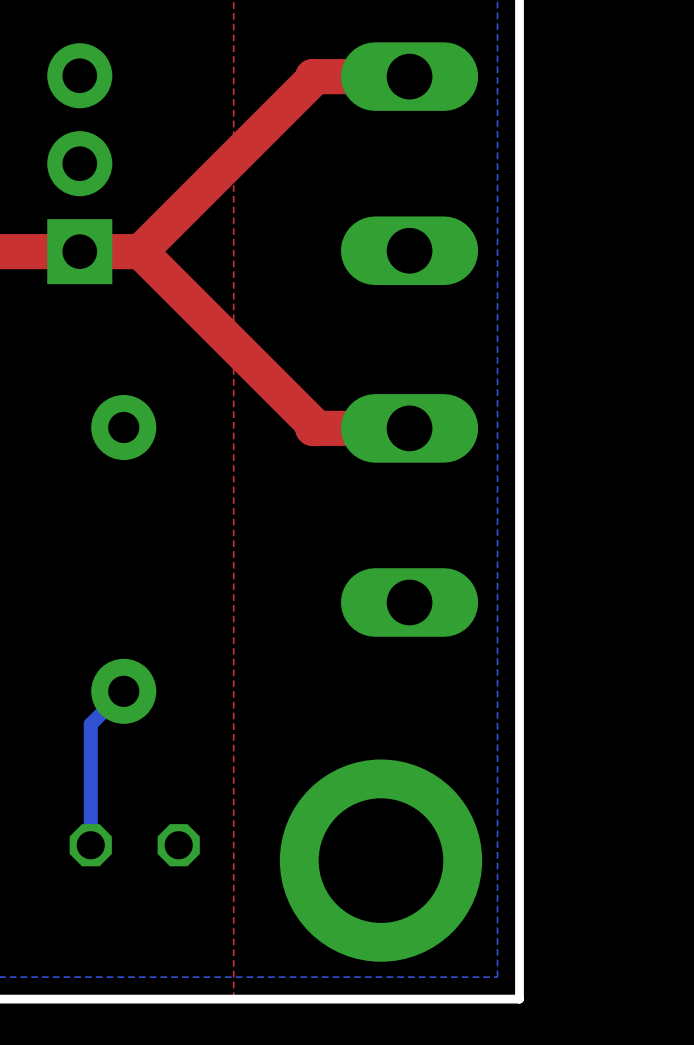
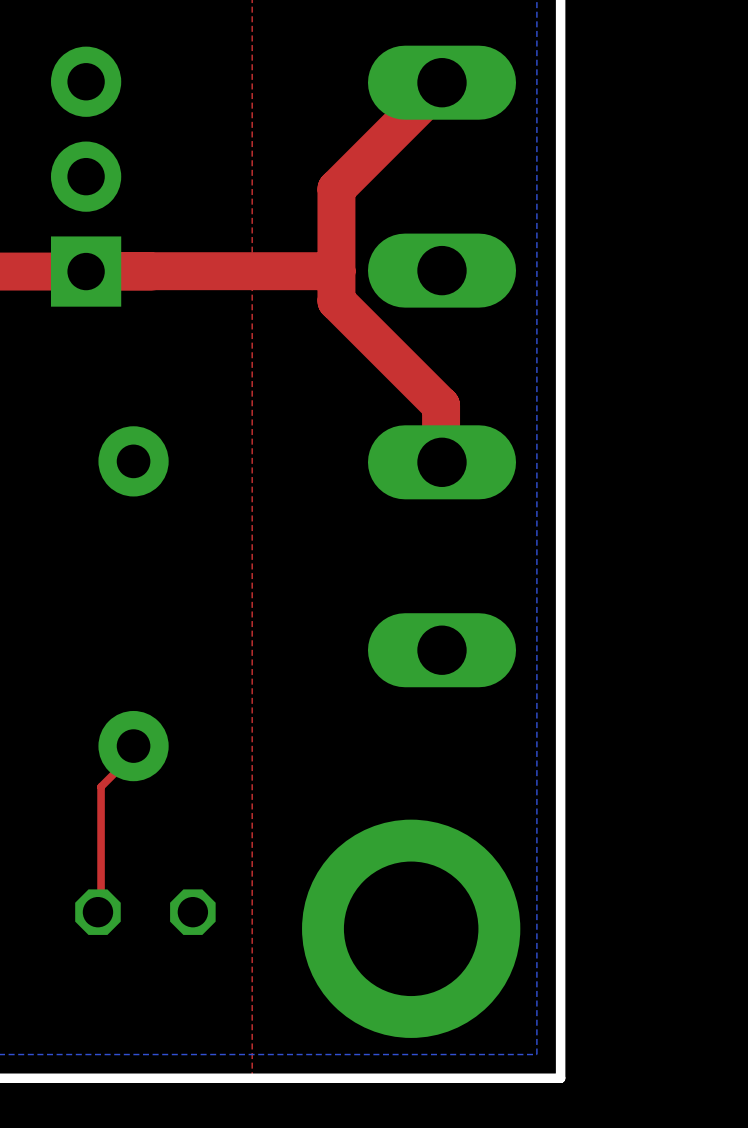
top track: (409, 76) (312, 76) (312, 79) (140, 251) (312, 423) (312, 428) (409, 428) -> (442, 82) (336, 188) (336, 301) (441, 405) (442, 462)
top track: none -> (336, 271) (86, 271)
top track: none -> (133, 746) (130, 749) (130, 756) (101, 786) (101, 910) (97, 912)
bottom track: (123, 691) (90, 724) (90, 845) -> none

